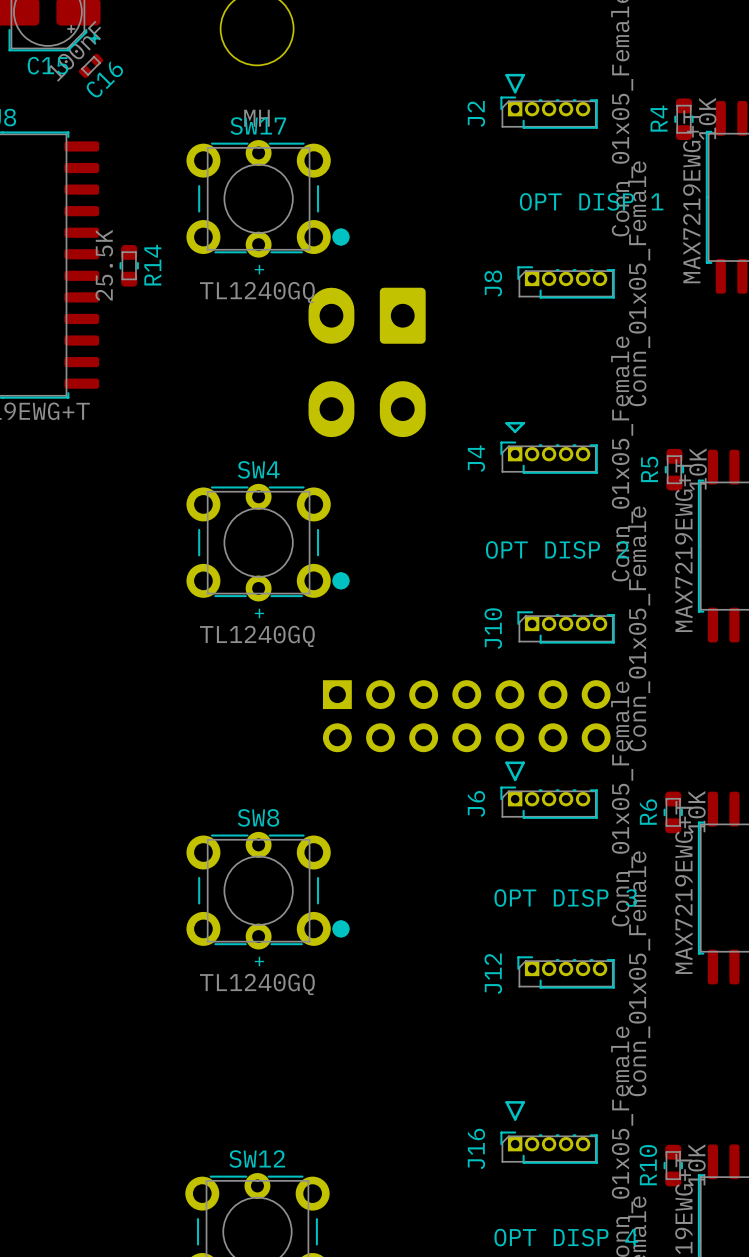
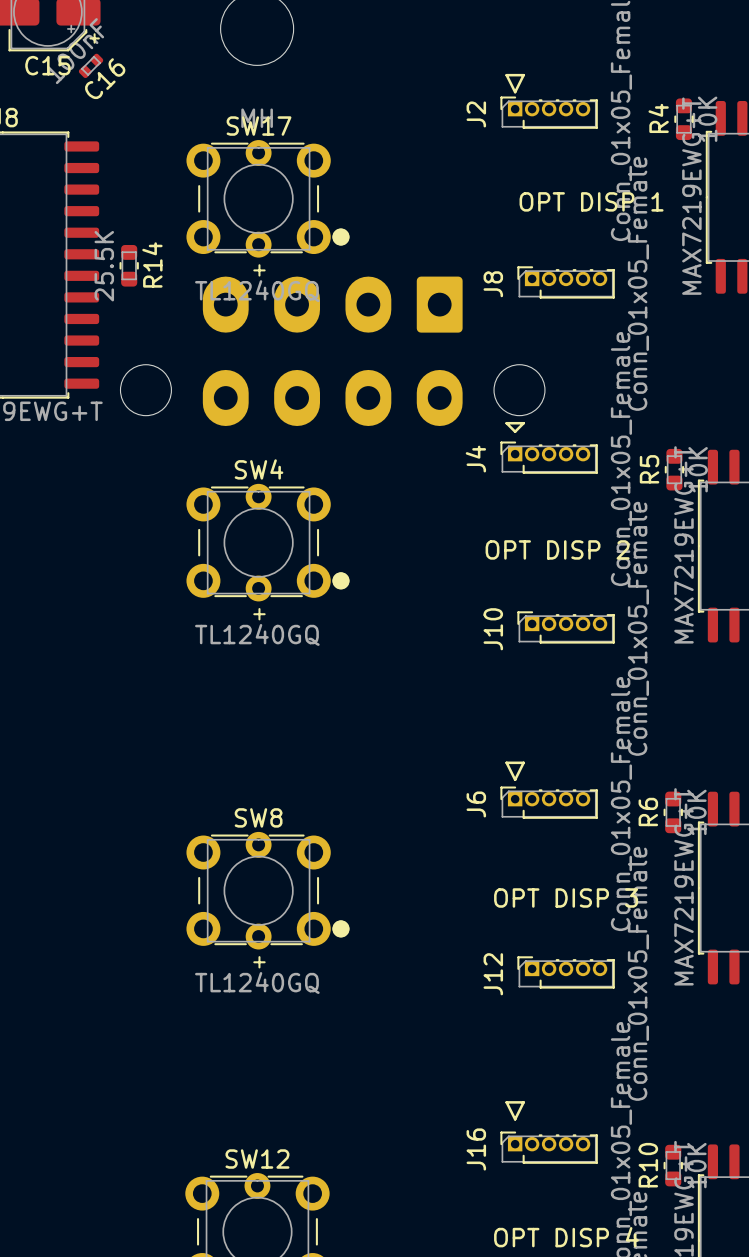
part: none -> (332, 351)
part: (367, 362) -> none
part: (466, 716) -> none

